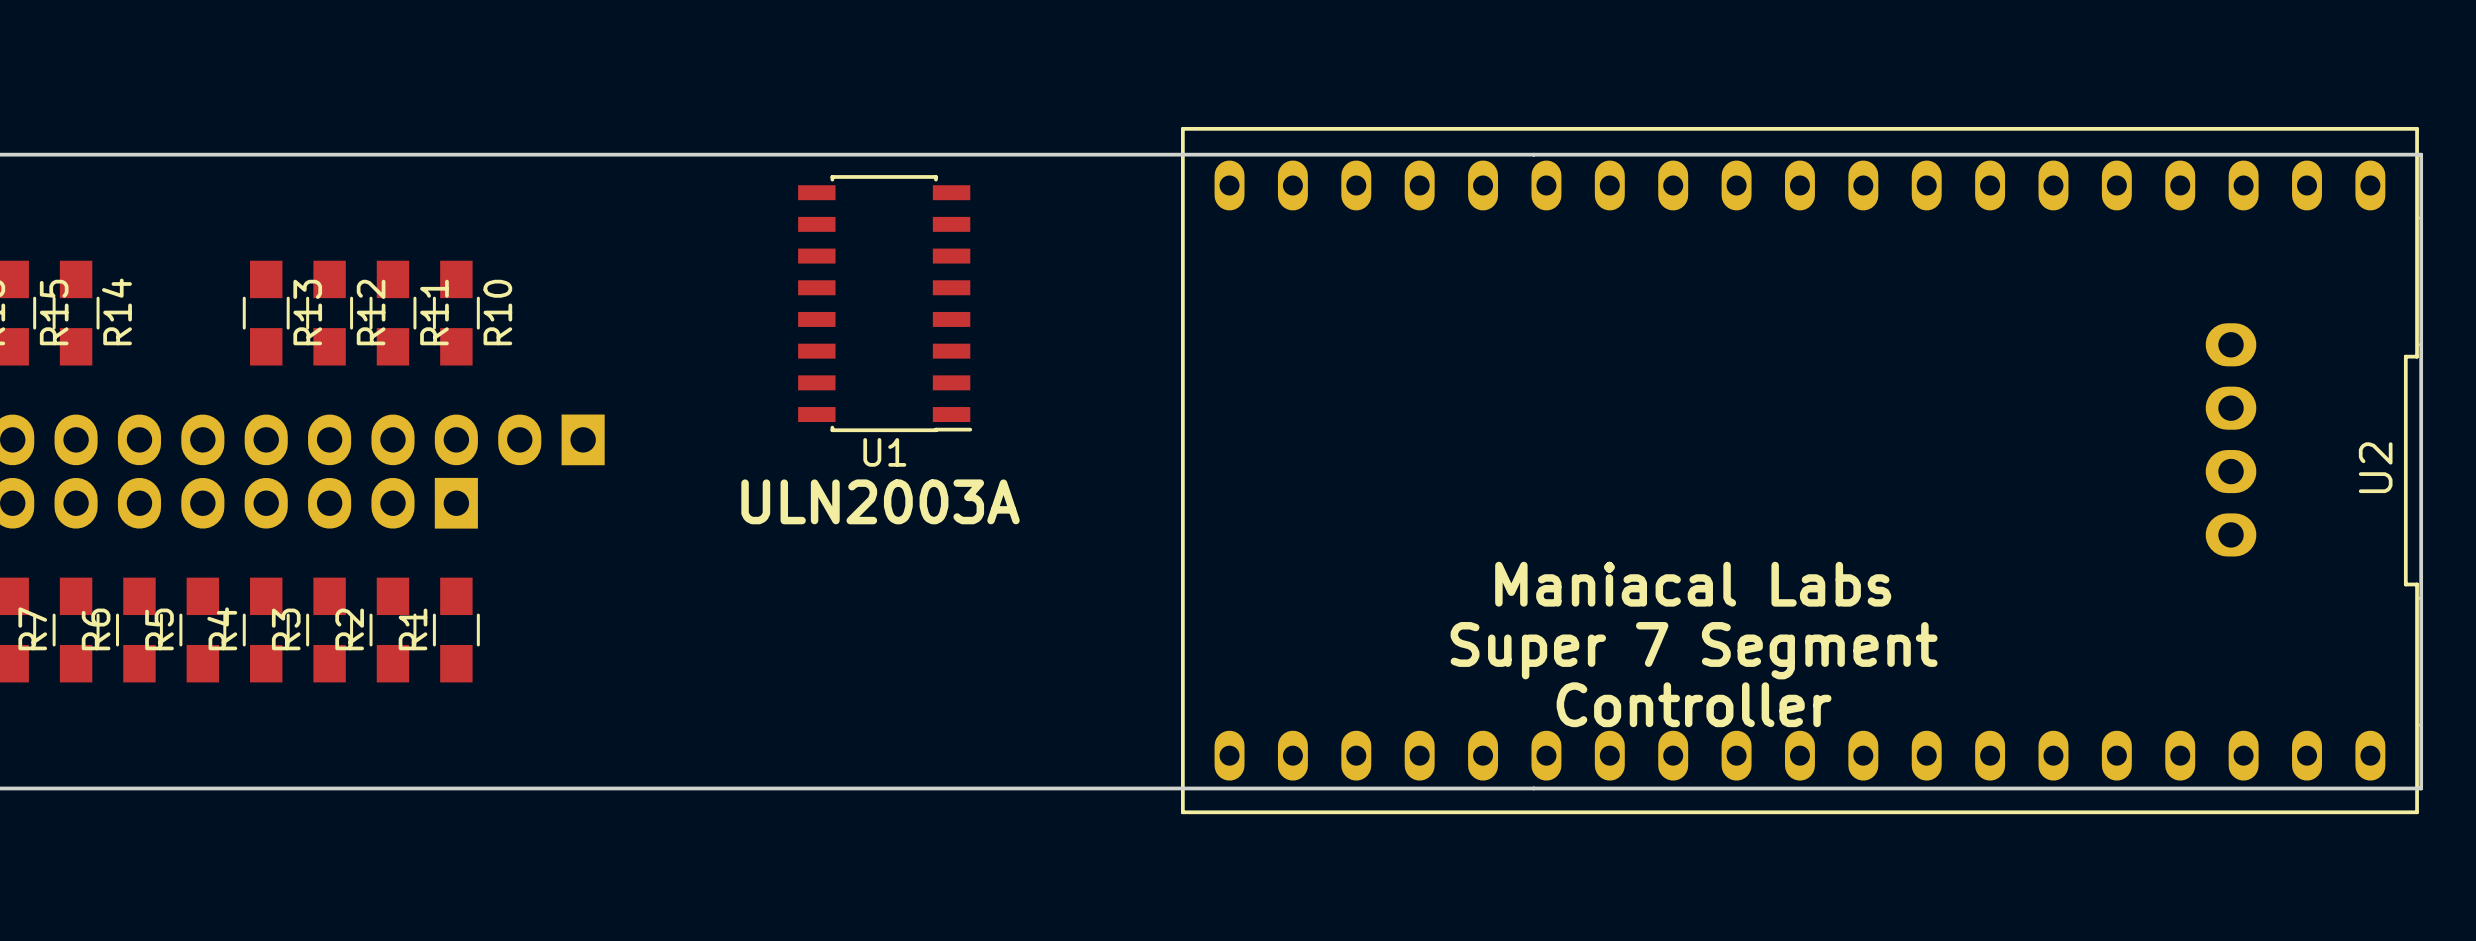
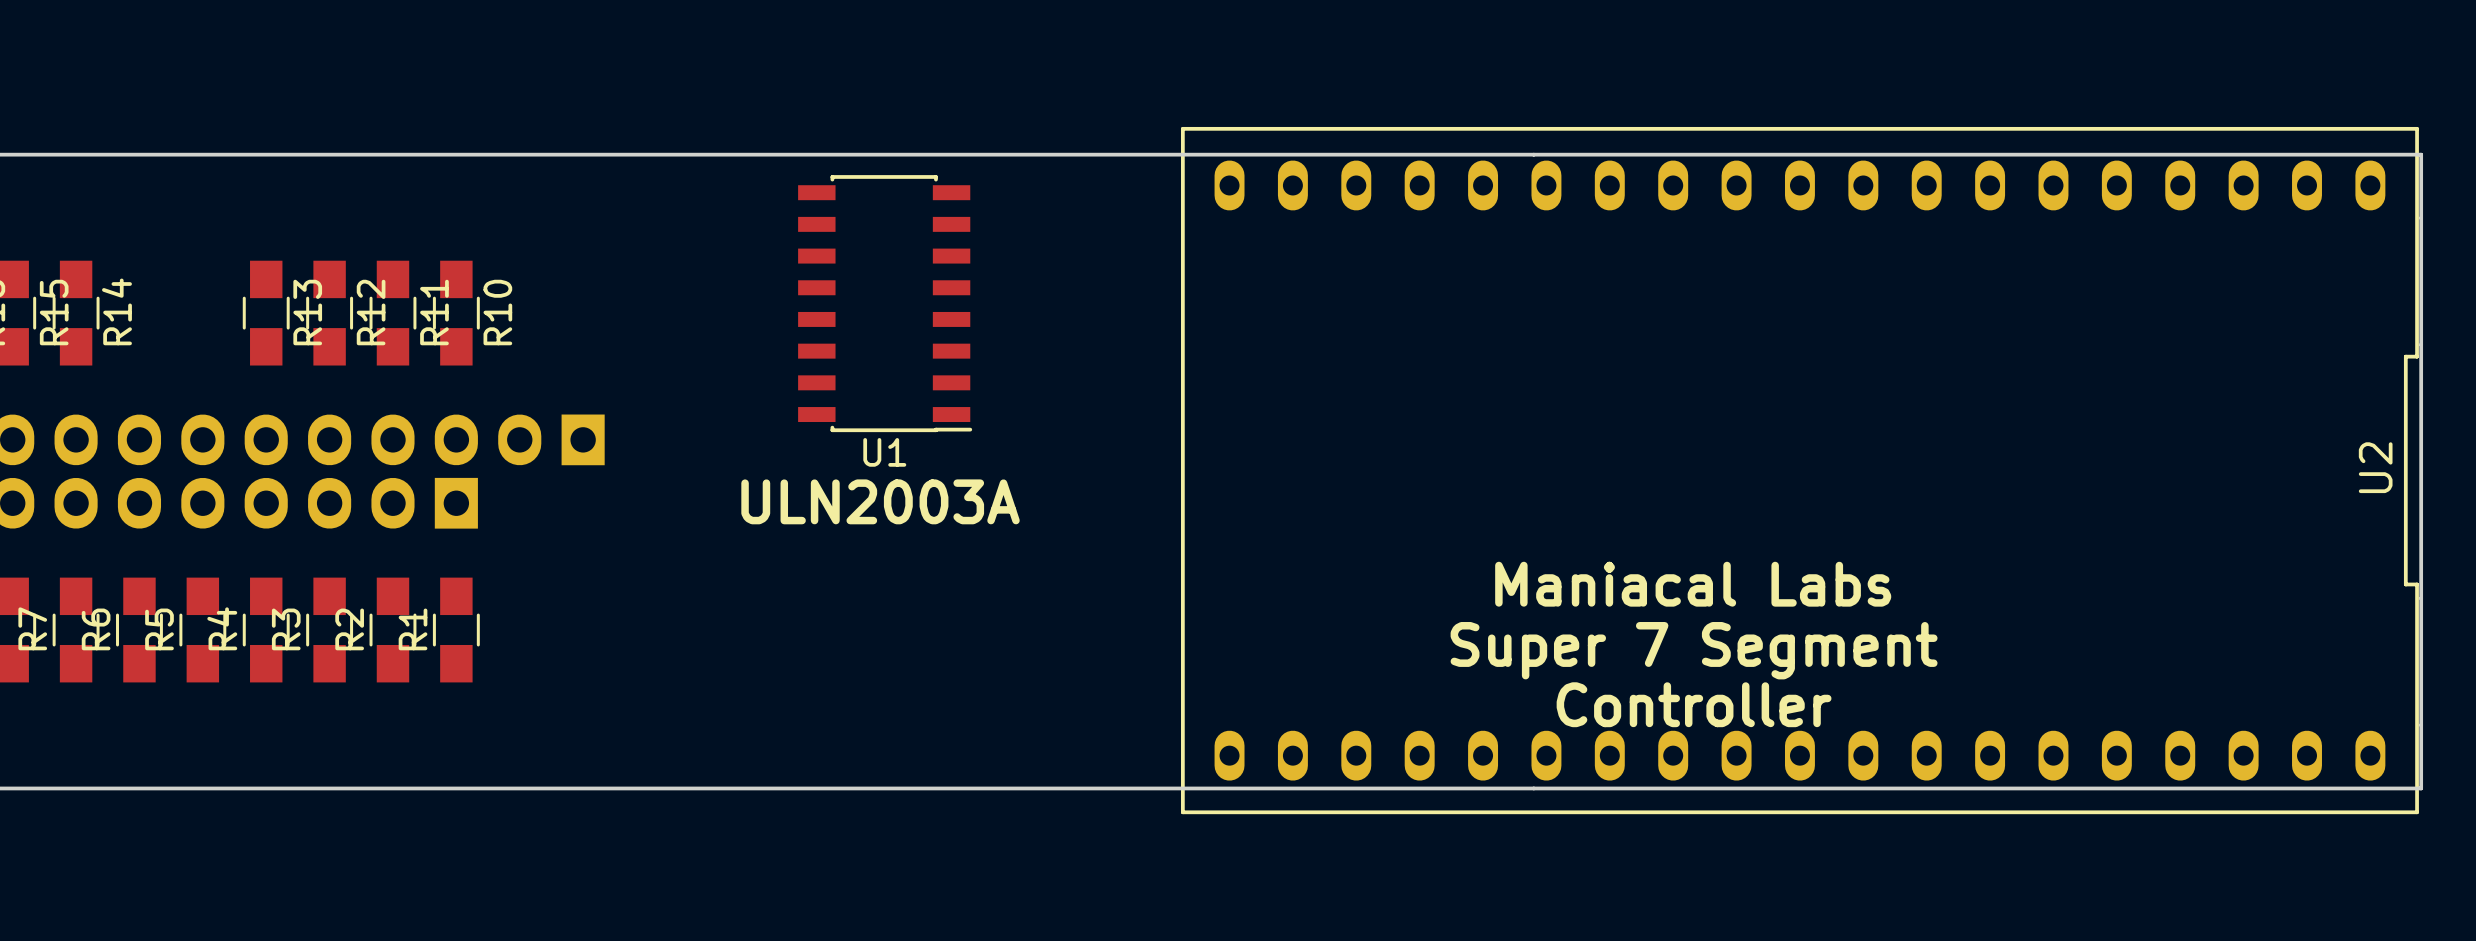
part: (2231, 439) -> none

